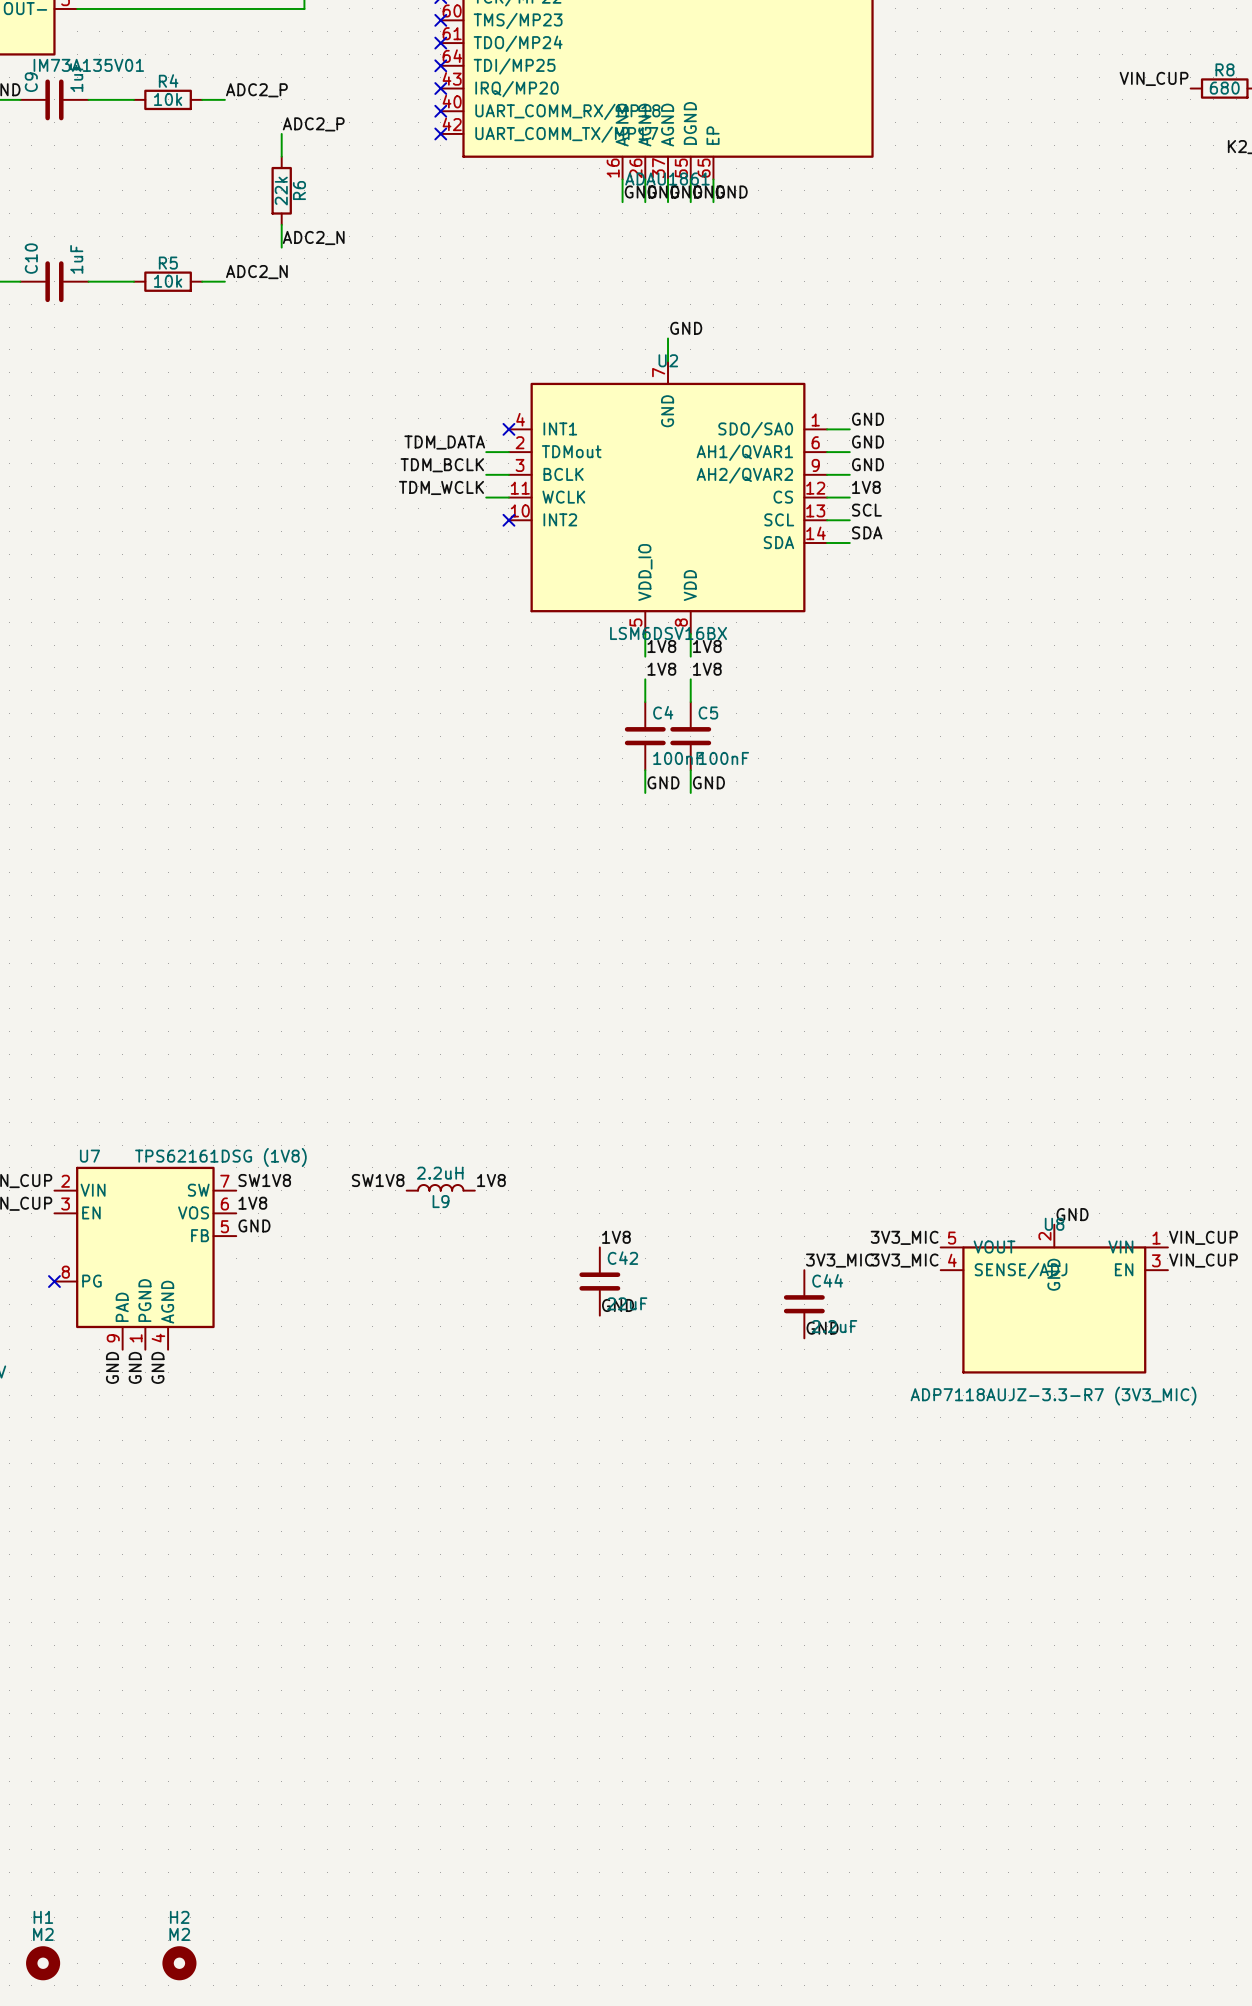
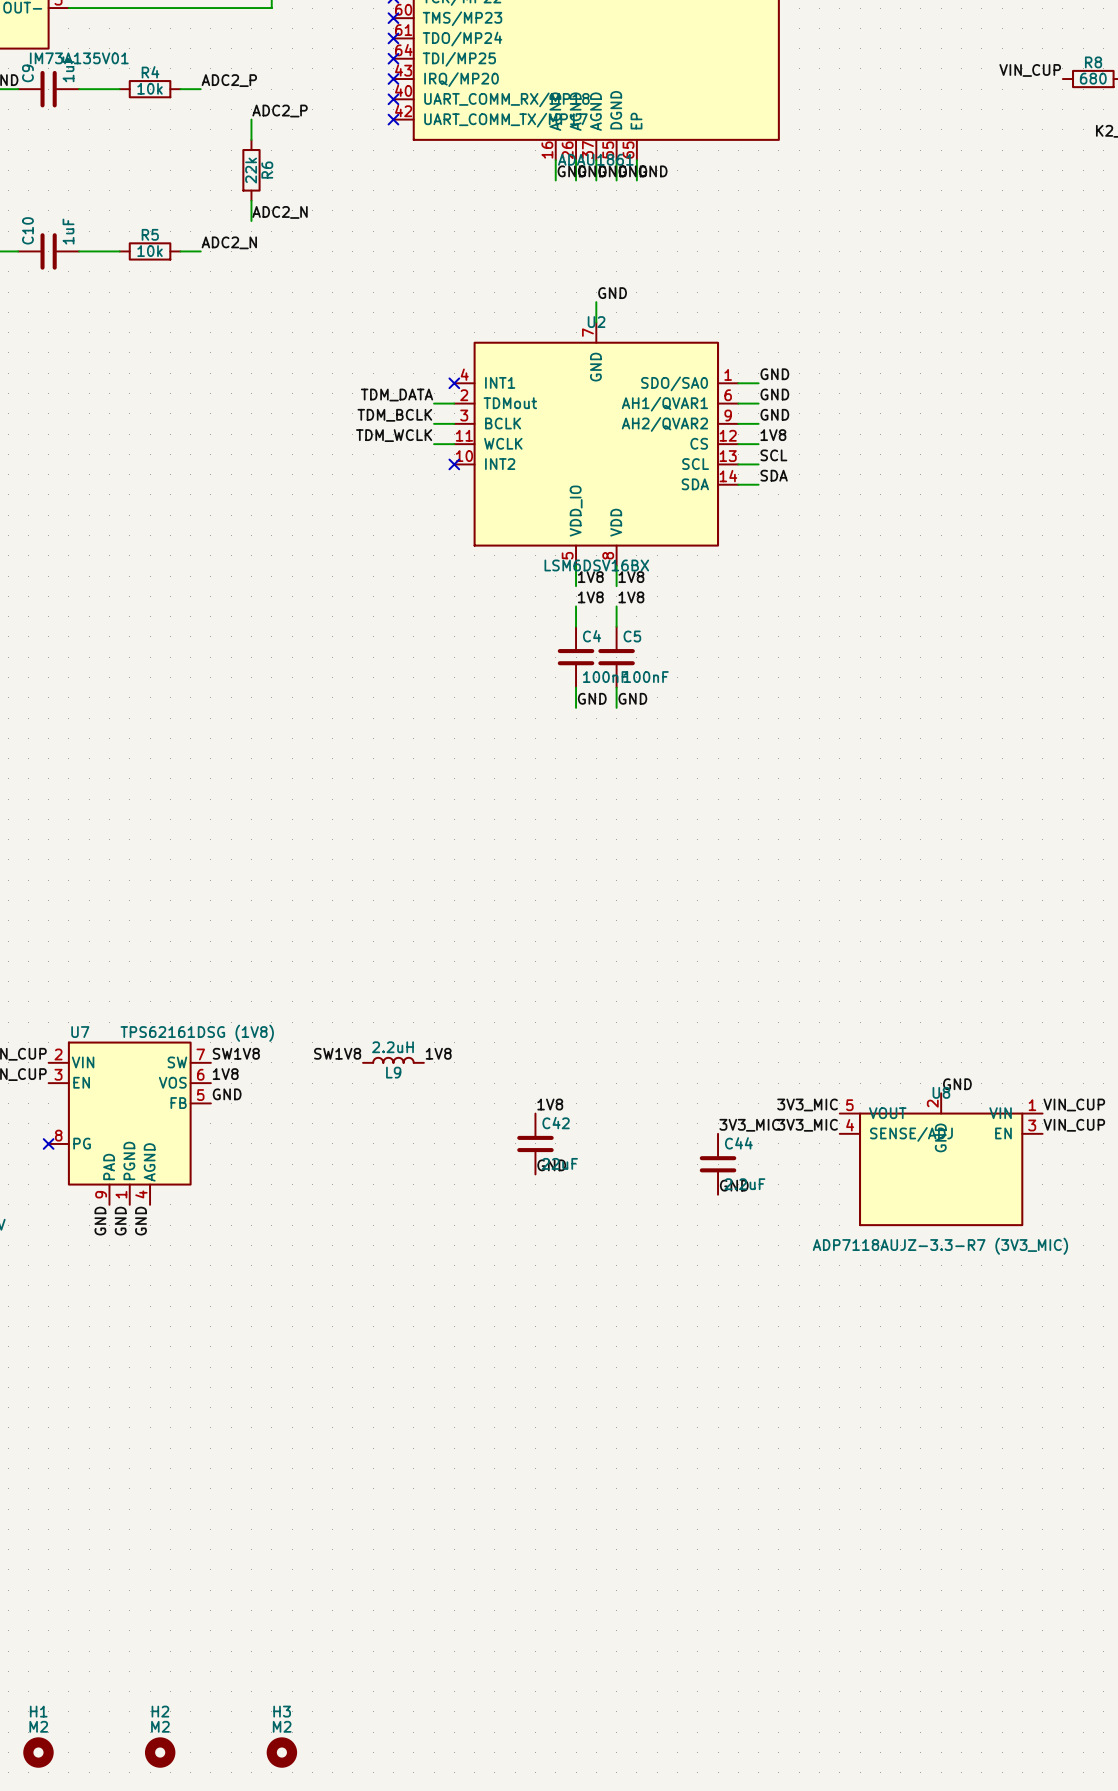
H3: none -> M2 (281, 1752)

